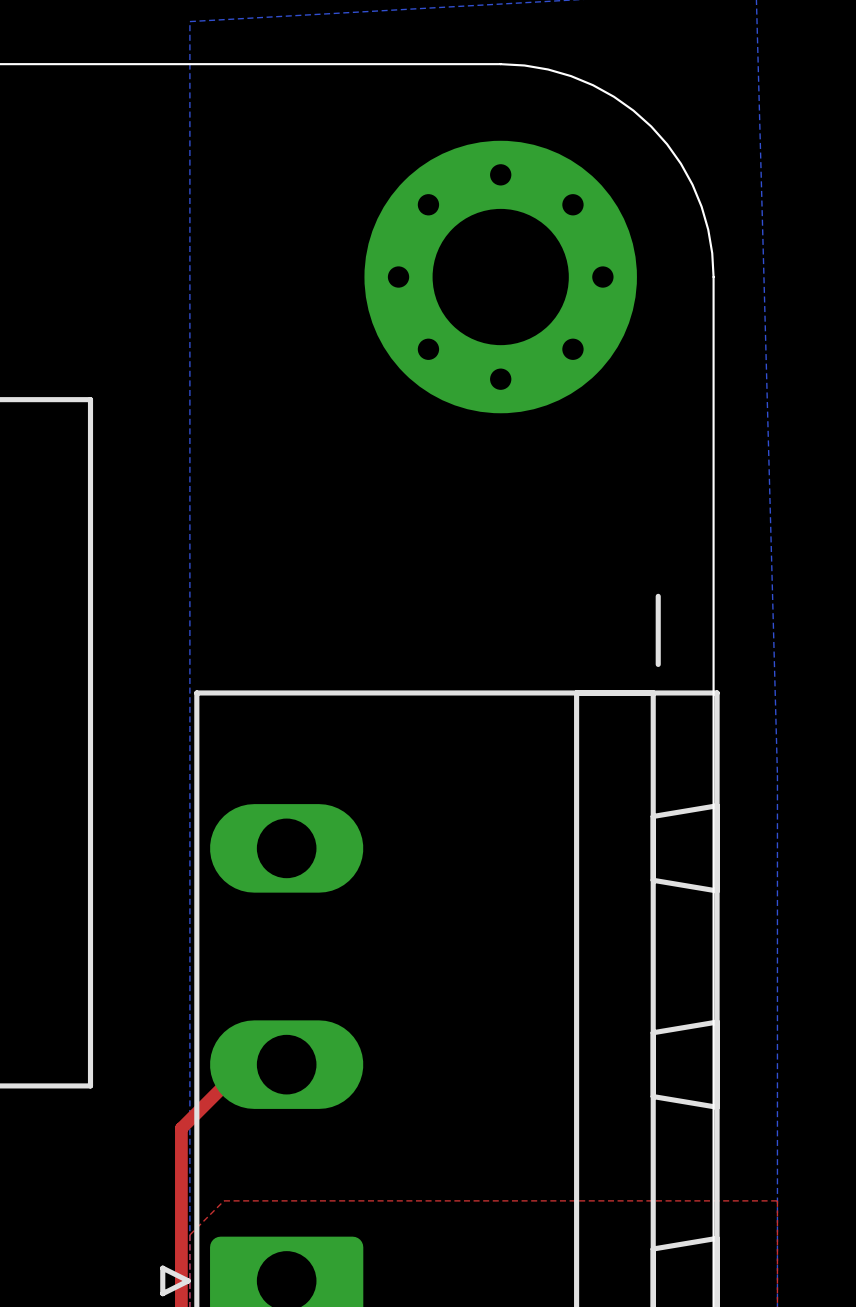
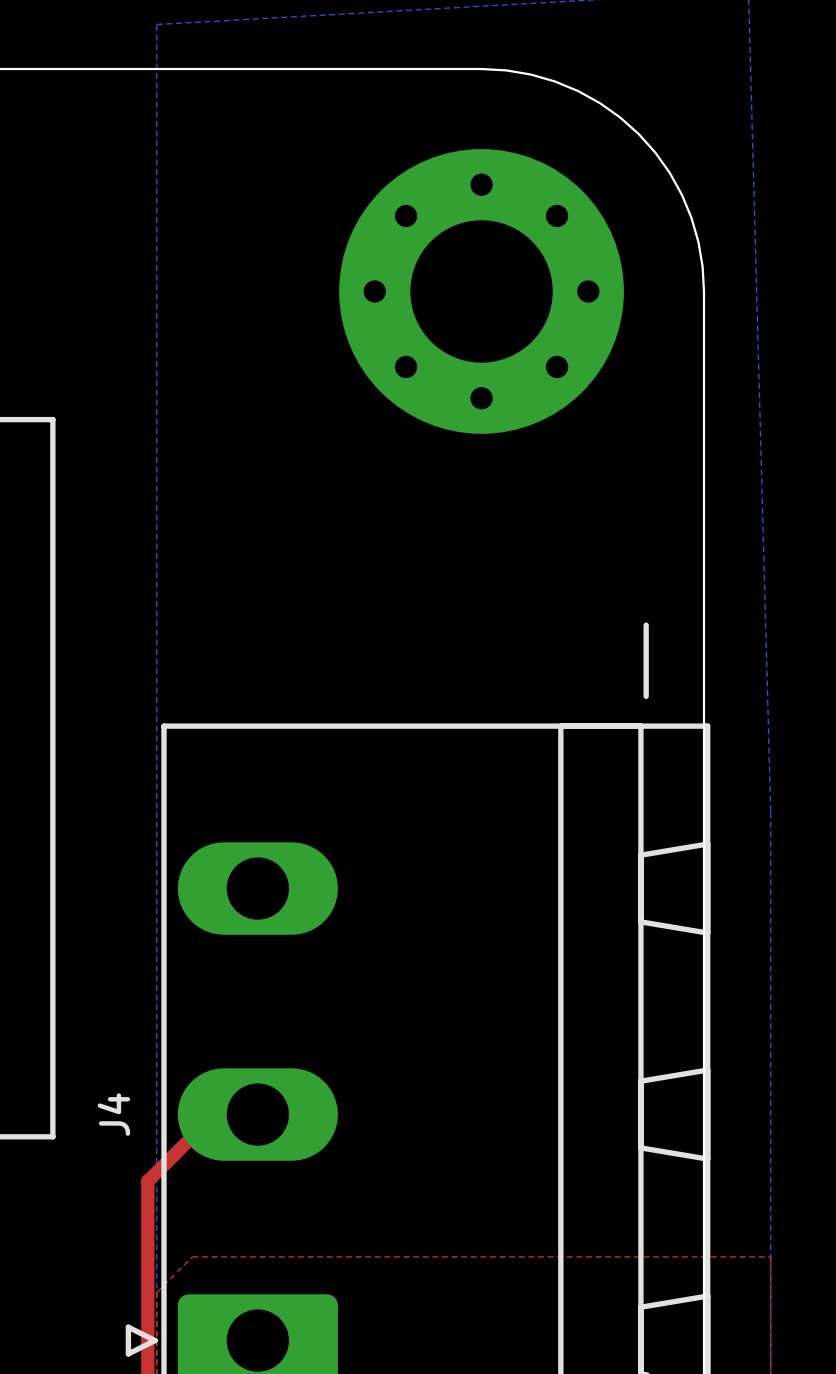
J4 name: none -> J4 (113, 1114)

